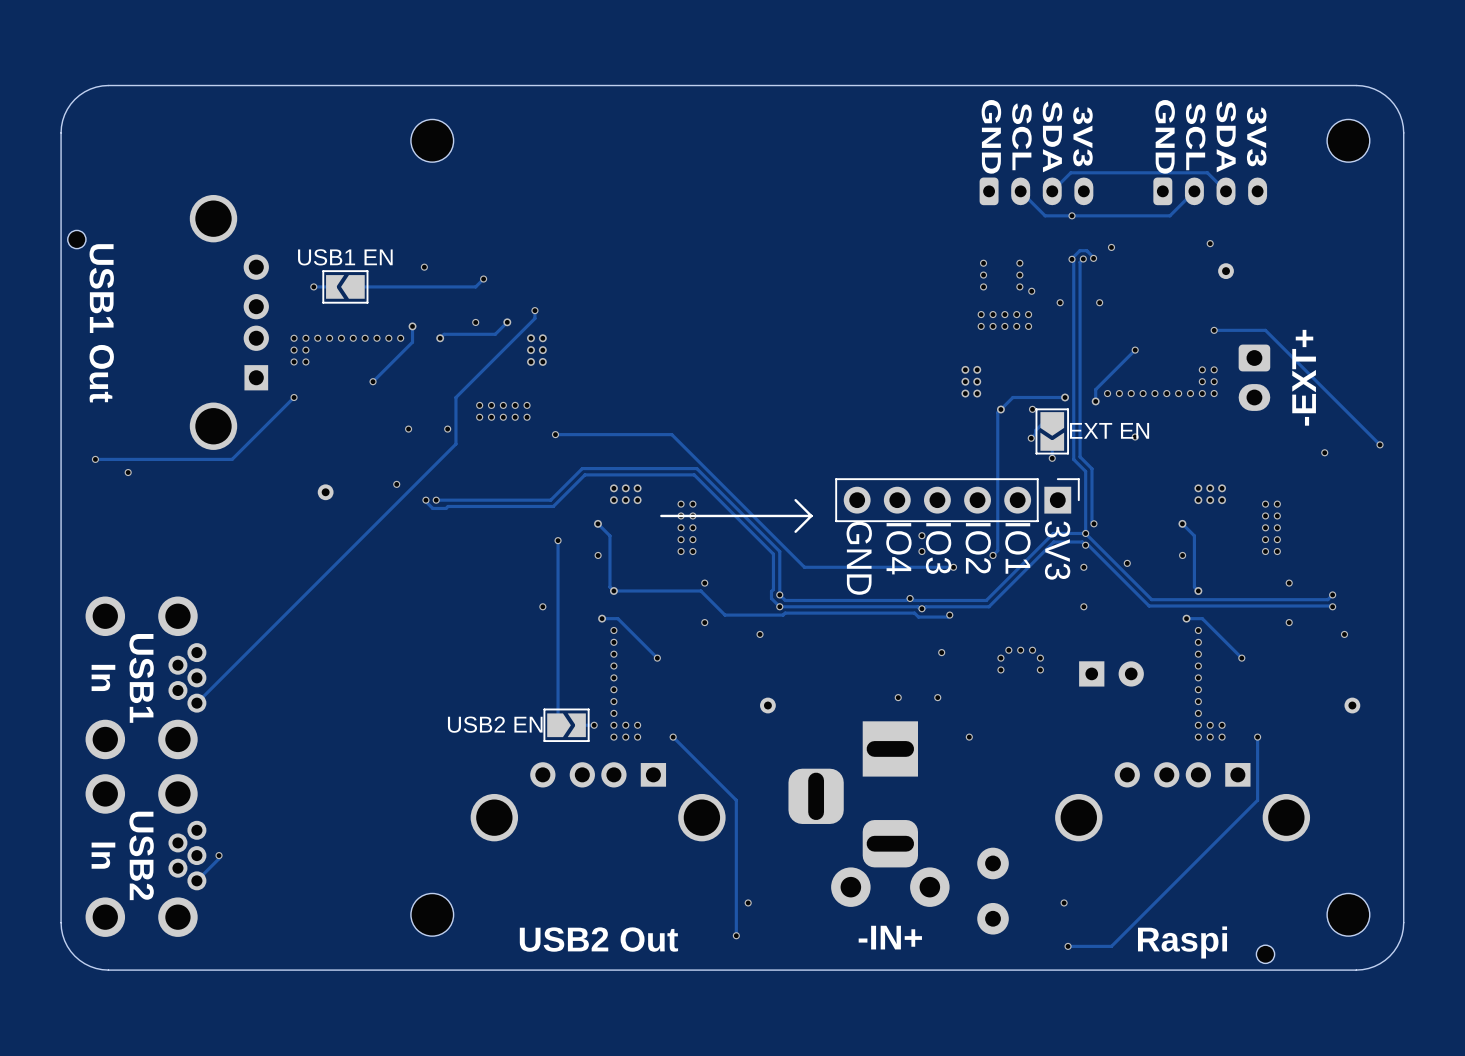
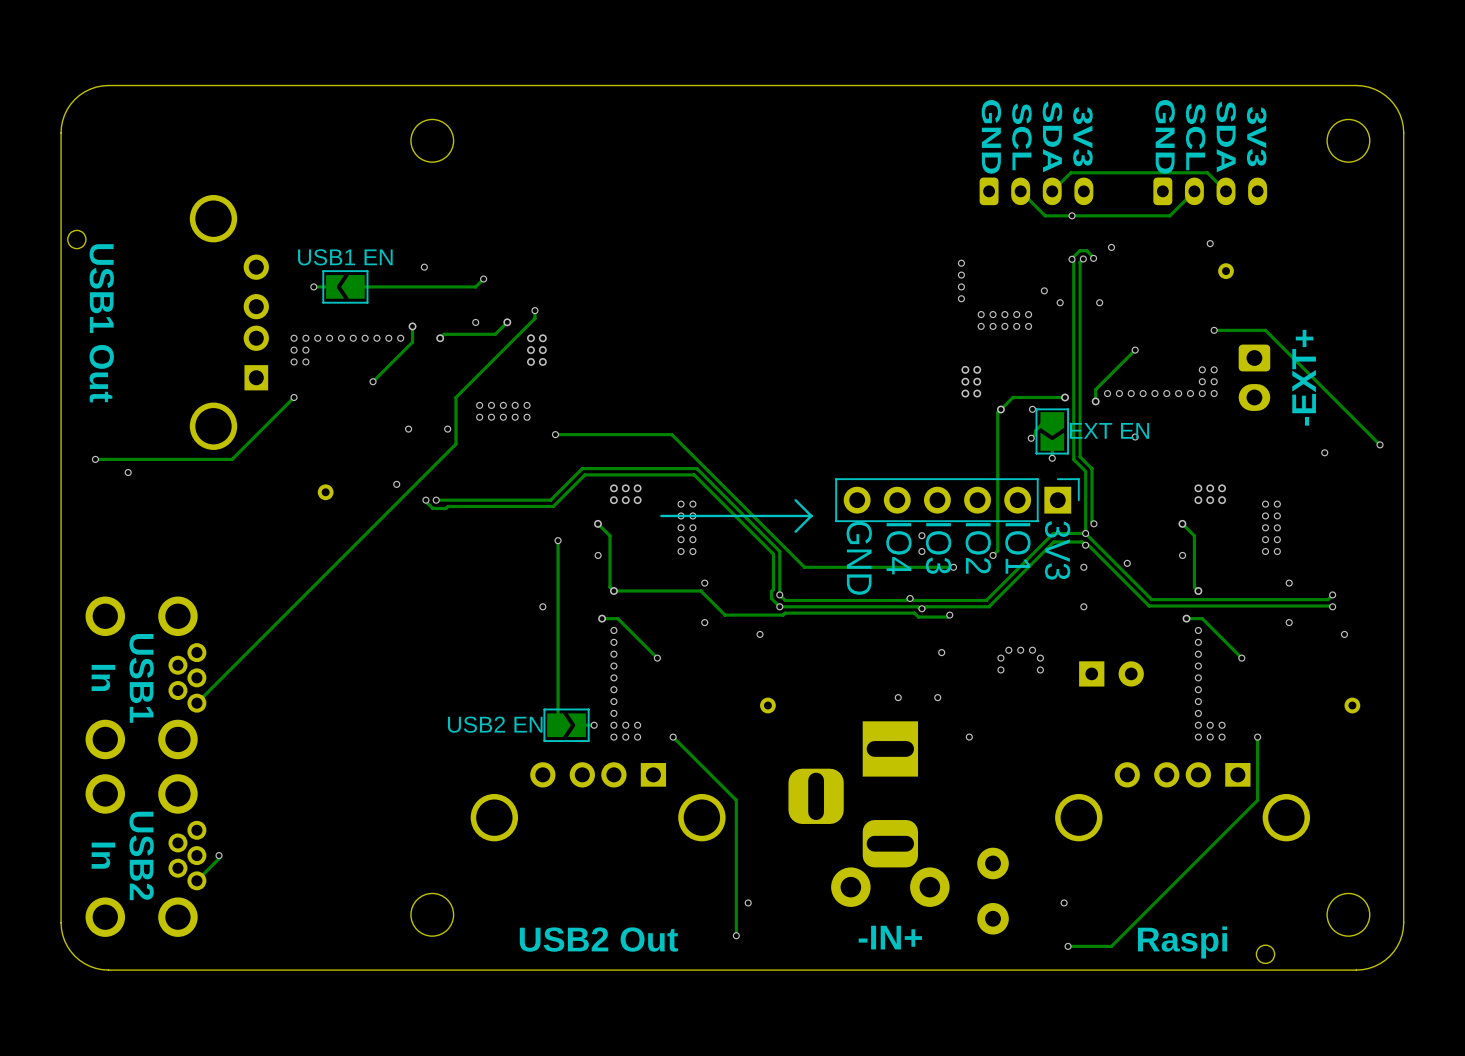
via: none -> (961, 263)
via: (983, 263) -> none
via: (1019, 263) -> none
via: none -> (961, 275)
via: (983, 275) -> none
via: (1019, 275) -> none
via: none -> (961, 286)
via: (983, 286) -> none
via: (1019, 286) -> none
via: none -> (1044, 290)
via: (1031, 291) -> none
via: none -> (961, 298)

